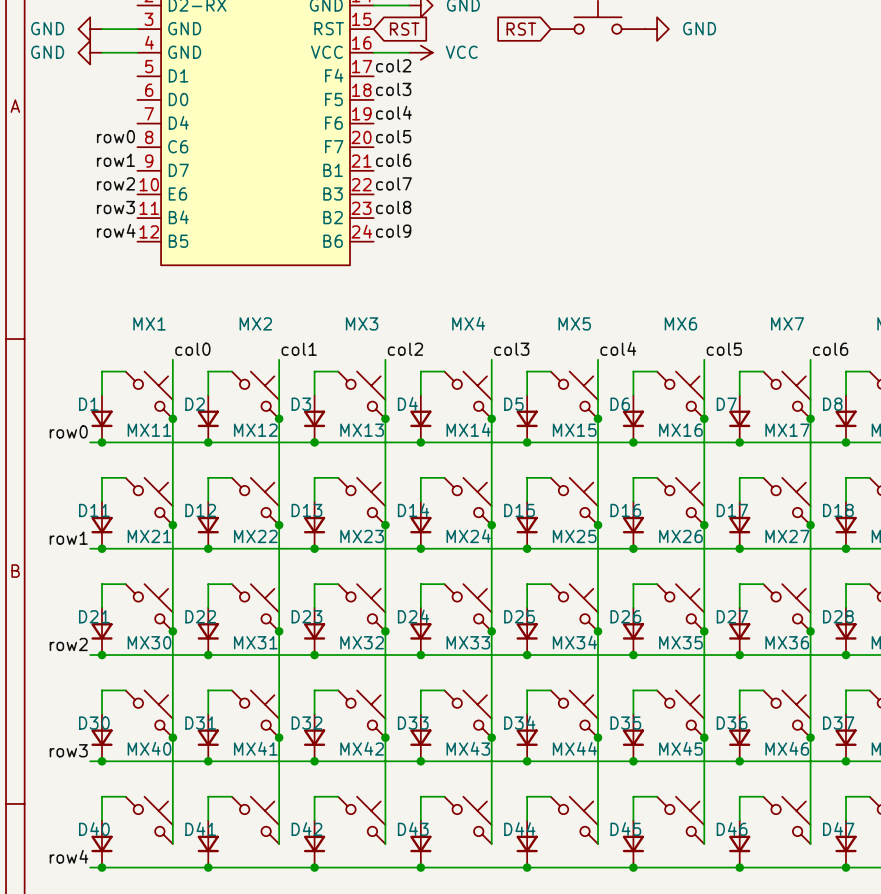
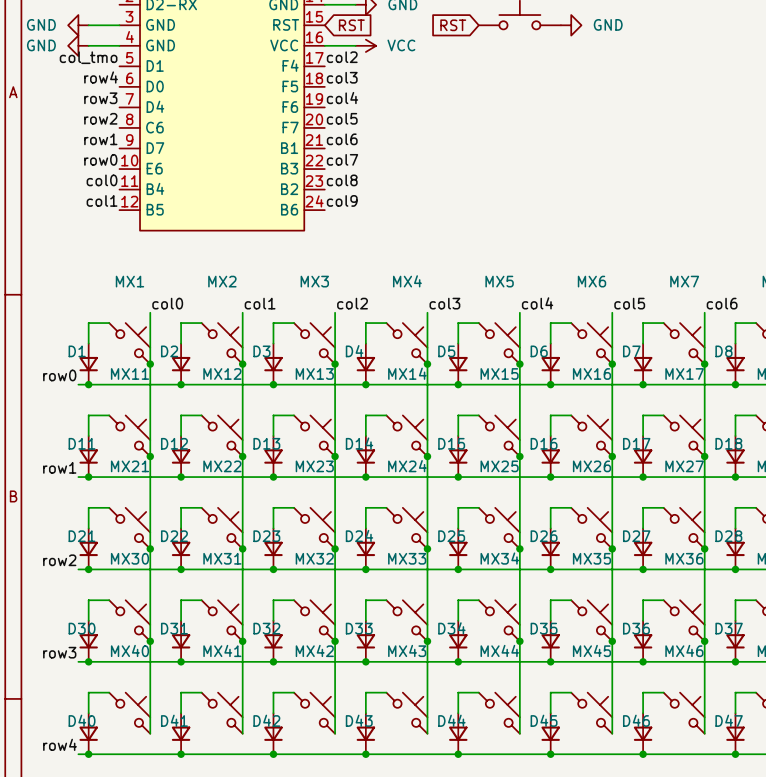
label: none -> col_tmo (88, 57)
label: none -> row4 (101, 77)
label: none -> row3 (100, 98)
label: row0 (115, 136) -> row2 (100, 118)
label: row2 (115, 183) -> row0 (100, 159)
label: row3 (115, 207) -> col0 (102, 180)
label: row4 (116, 230) -> col1 (102, 200)

